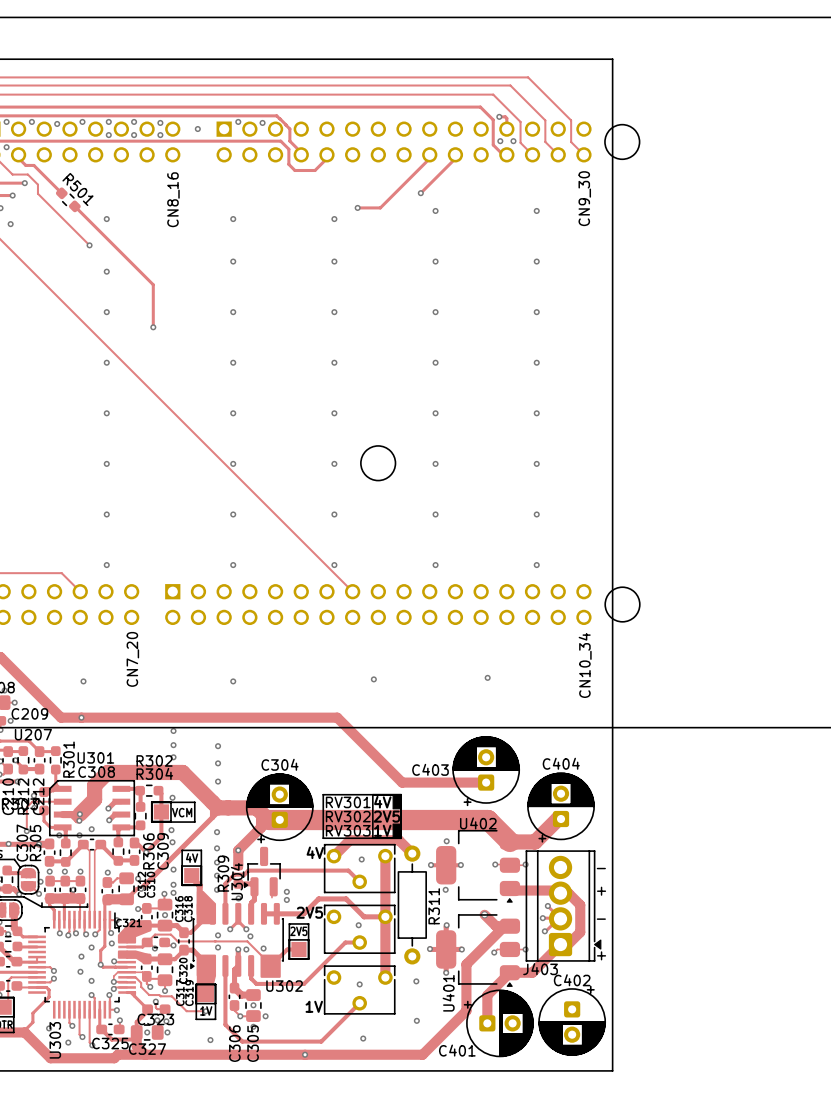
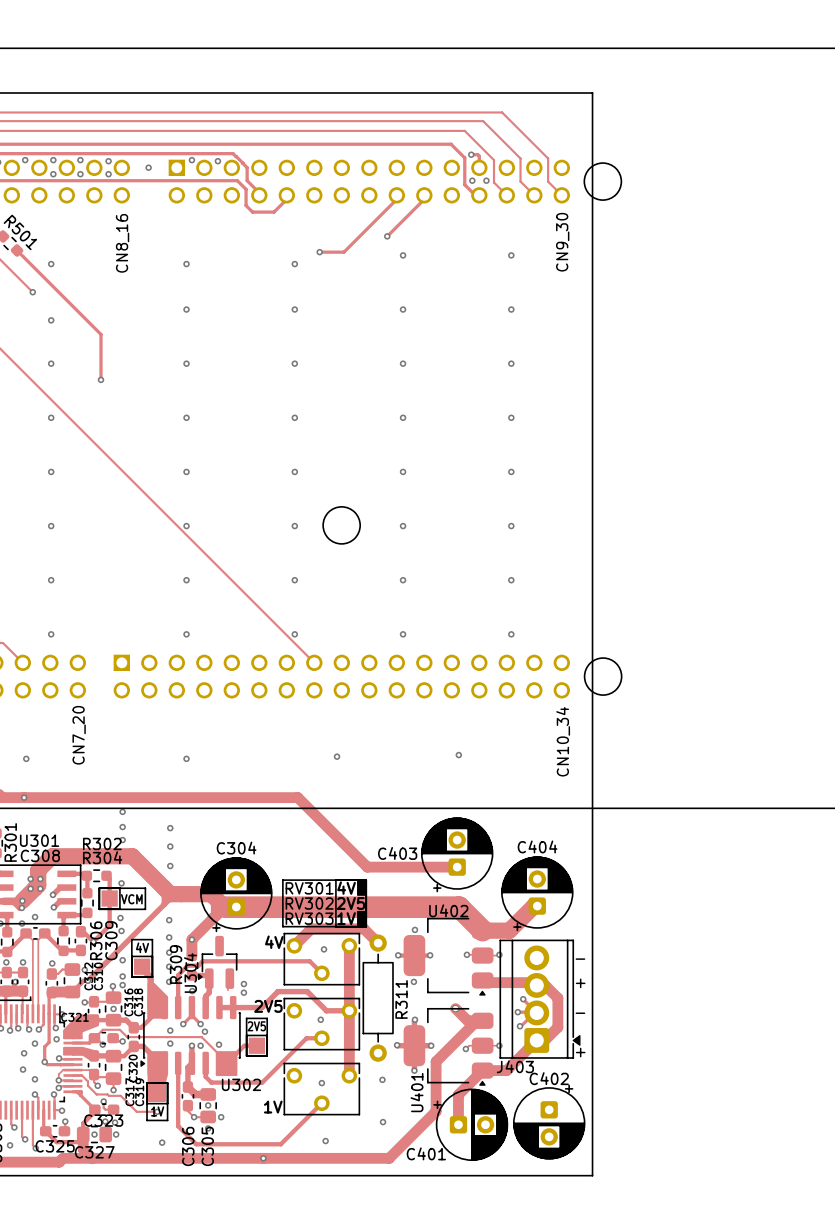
via: none -> (30, 879)
via: none -> (40, 879)
via: none -> (30, 888)
via: none -> (40, 888)

